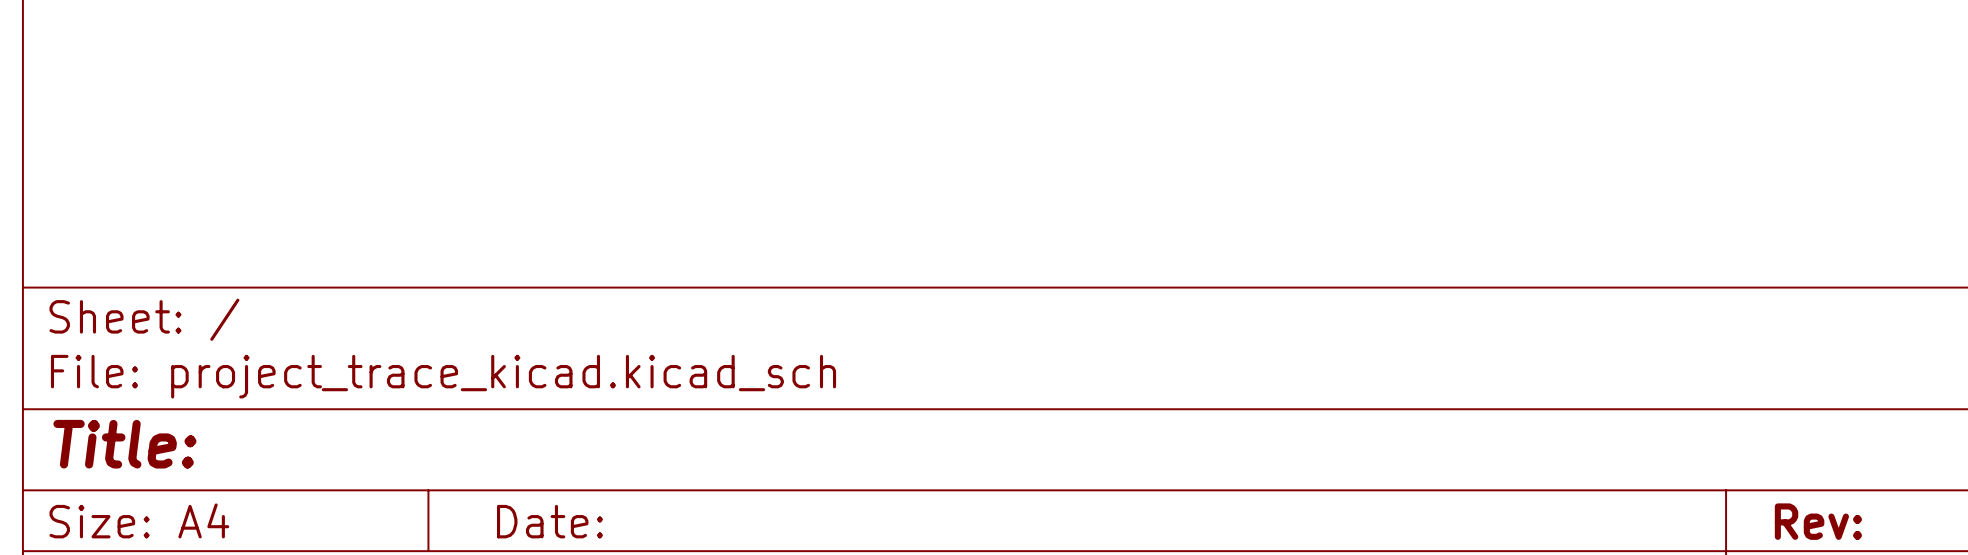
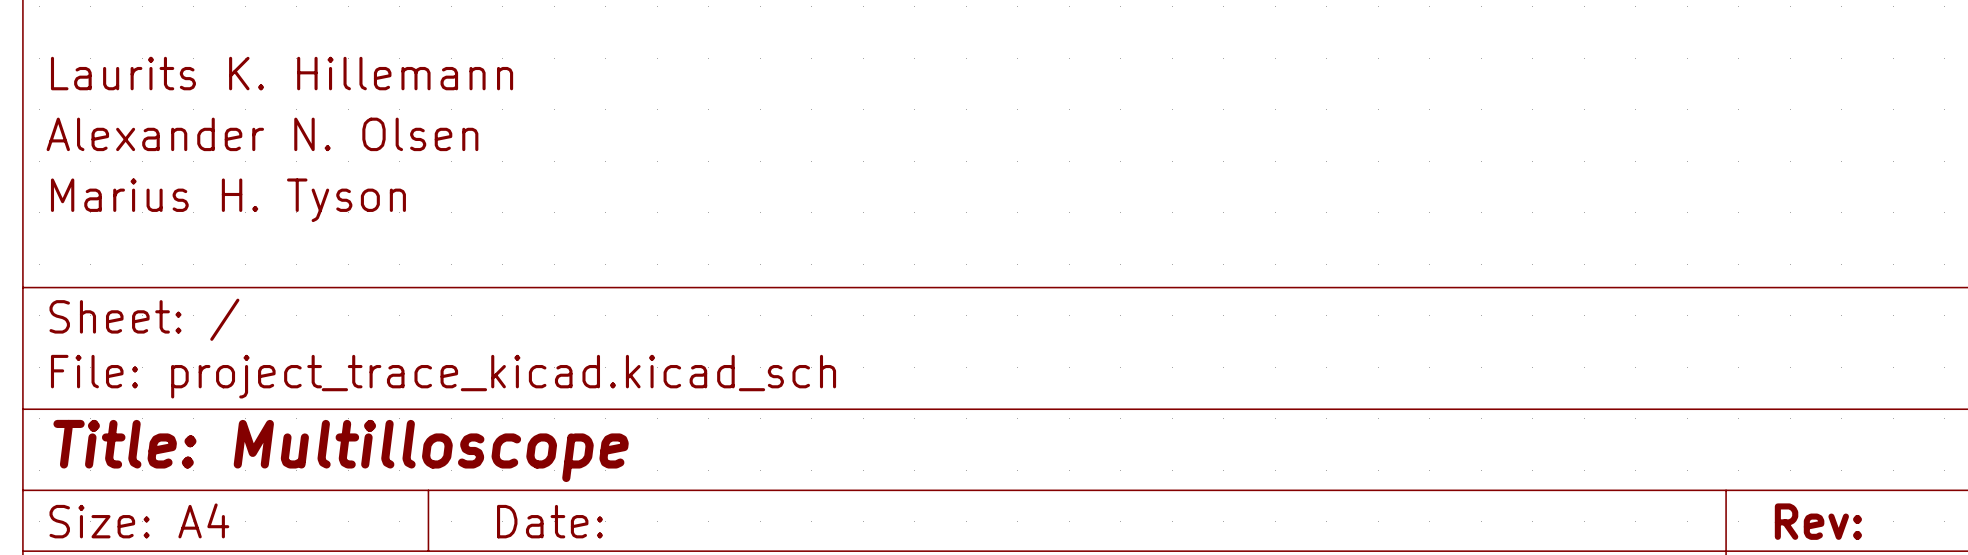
title block: none -> Laurits K. Hillemann (282, 73)
title block: none -> Alexander N. Olsen (262, 134)
title block: none -> Marius H. Tyson (228, 200)
title block: Title: (124, 444) -> Title: Multilloscope (341, 450)

